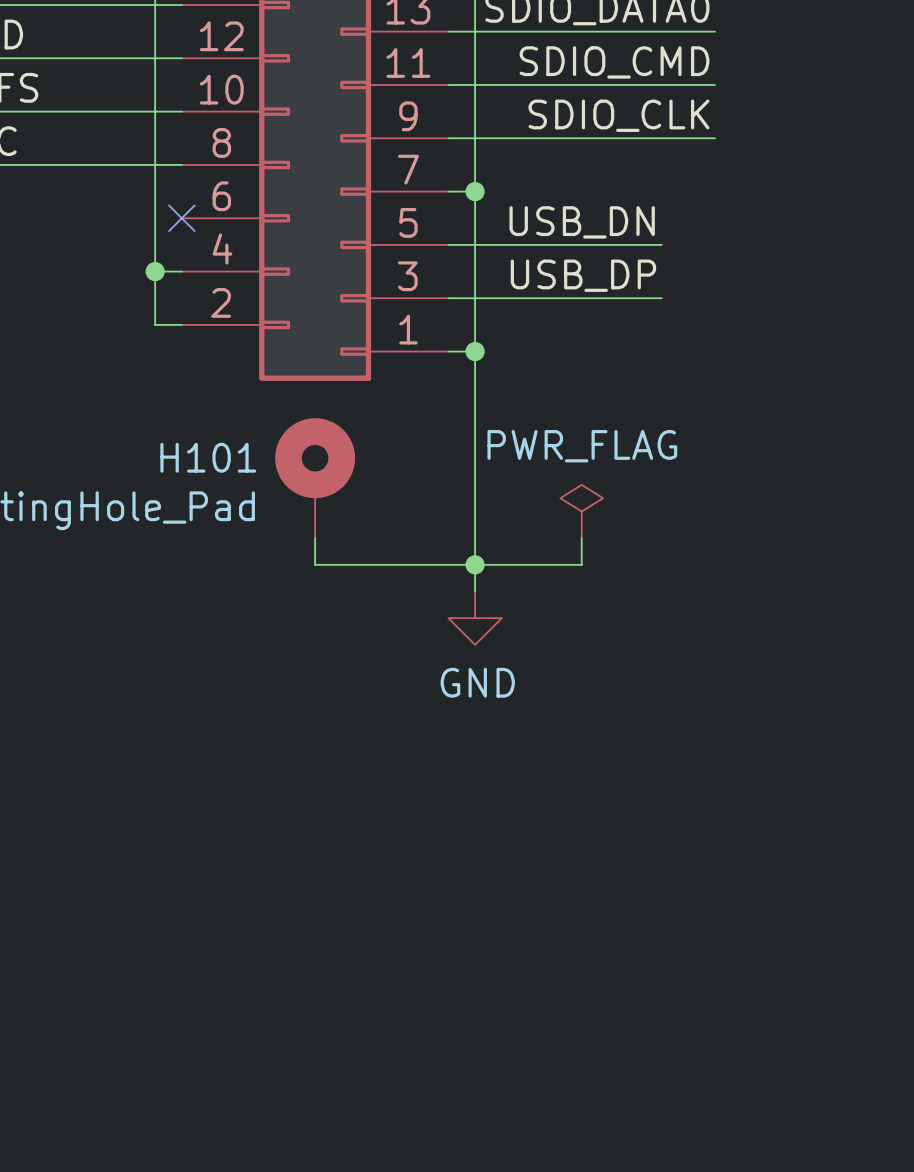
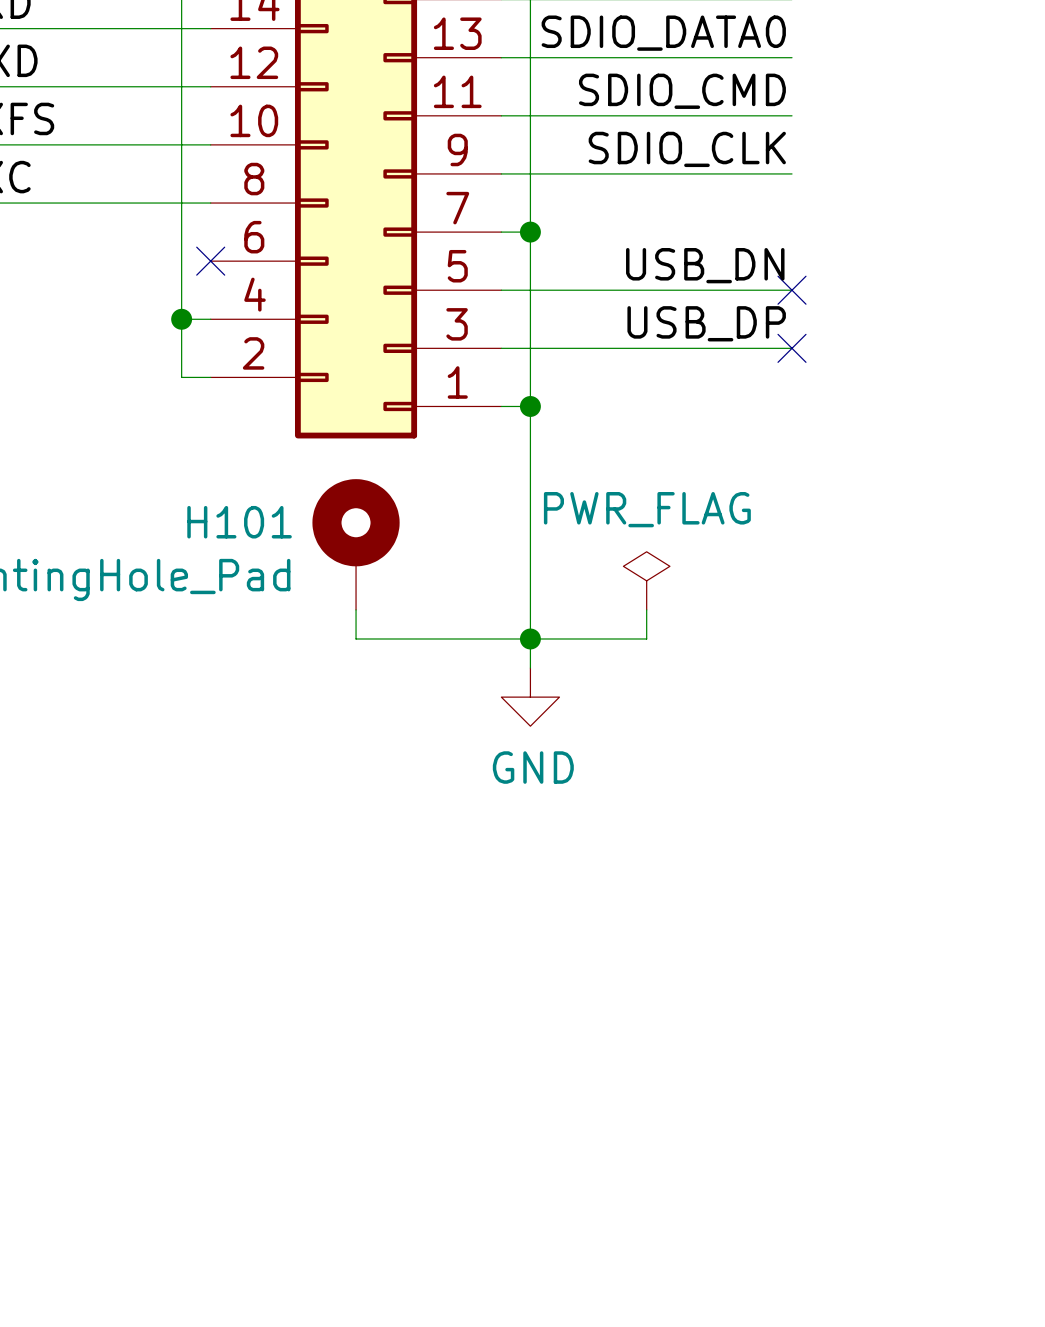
label position: USB_DN (582, 222) -> USB_DN (705, 265)
wire: none -> (733, 290) (792, 290)
no-connect mark: none -> (792, 290)
label position: USB_DP (583, 275) -> USB_DP (706, 323)
wire: none -> (733, 348) (792, 348)
no-connect mark: none -> (792, 348)

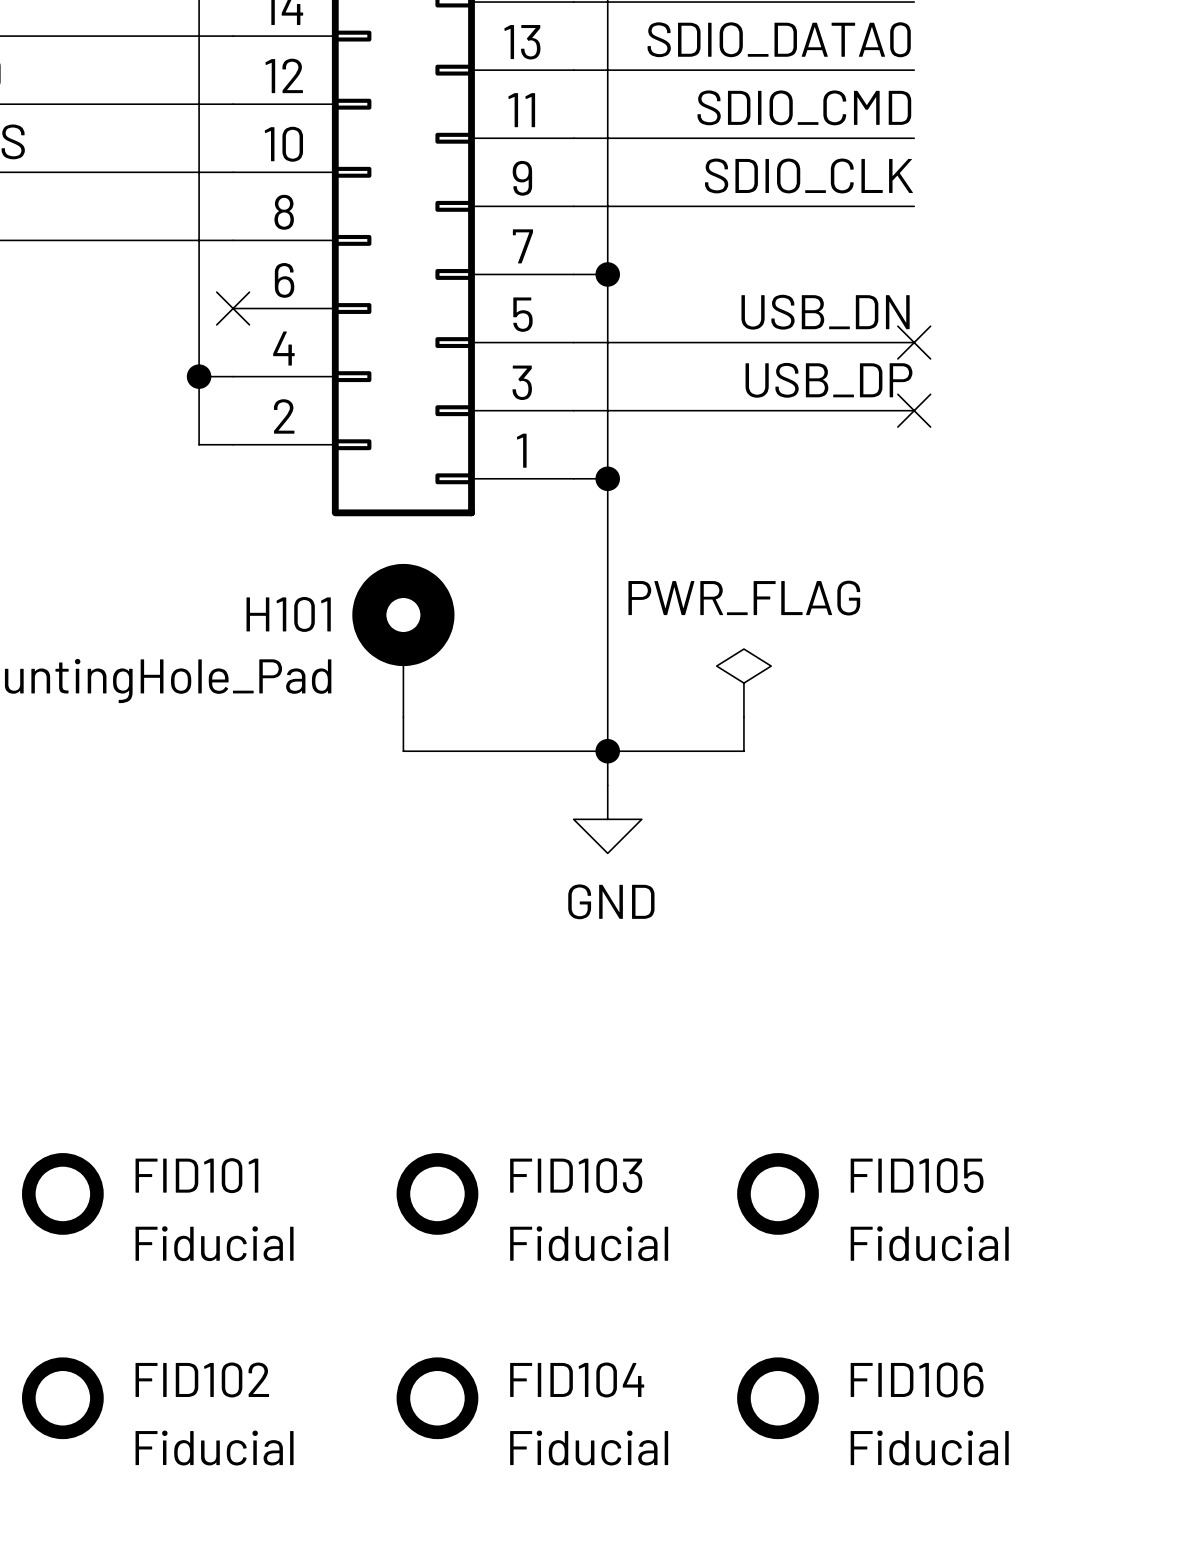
FID101: none -> Fiducial (62, 1193)
FID103: none -> Fiducial (437, 1193)
FID105: none -> Fiducial (778, 1193)
FID102: none -> Fiducial (62, 1398)
FID104: none -> Fiducial (437, 1398)
FID106: none -> Fiducial (778, 1398)

